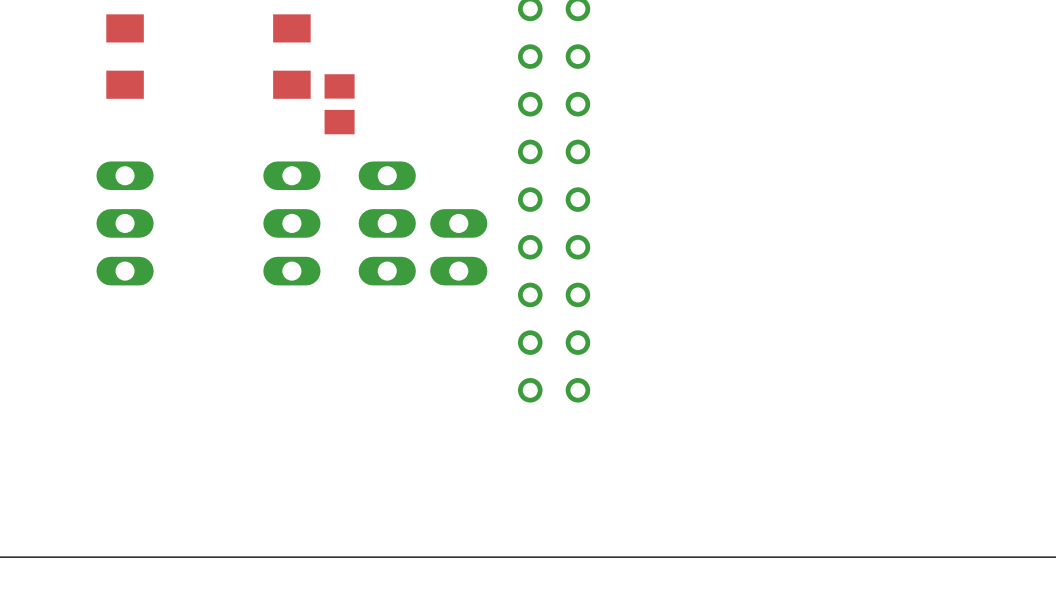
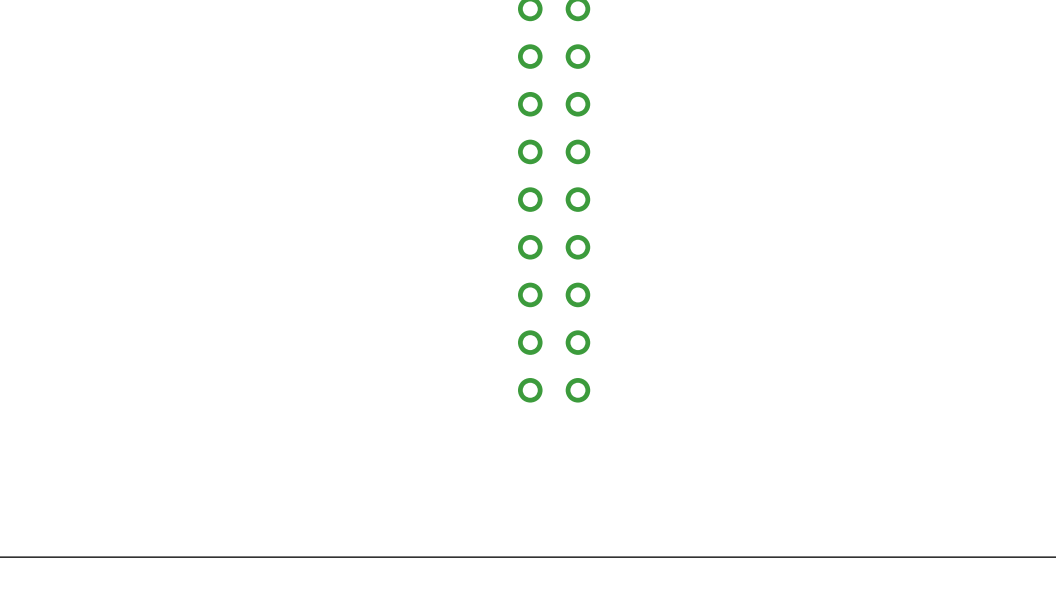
part: (125, 56) -> none
part: (291, 56) -> none
part: (339, 104) -> none
part: (125, 223) -> none
part: (291, 223) -> none
part: (387, 223) -> none
part: (458, 247) -> none

